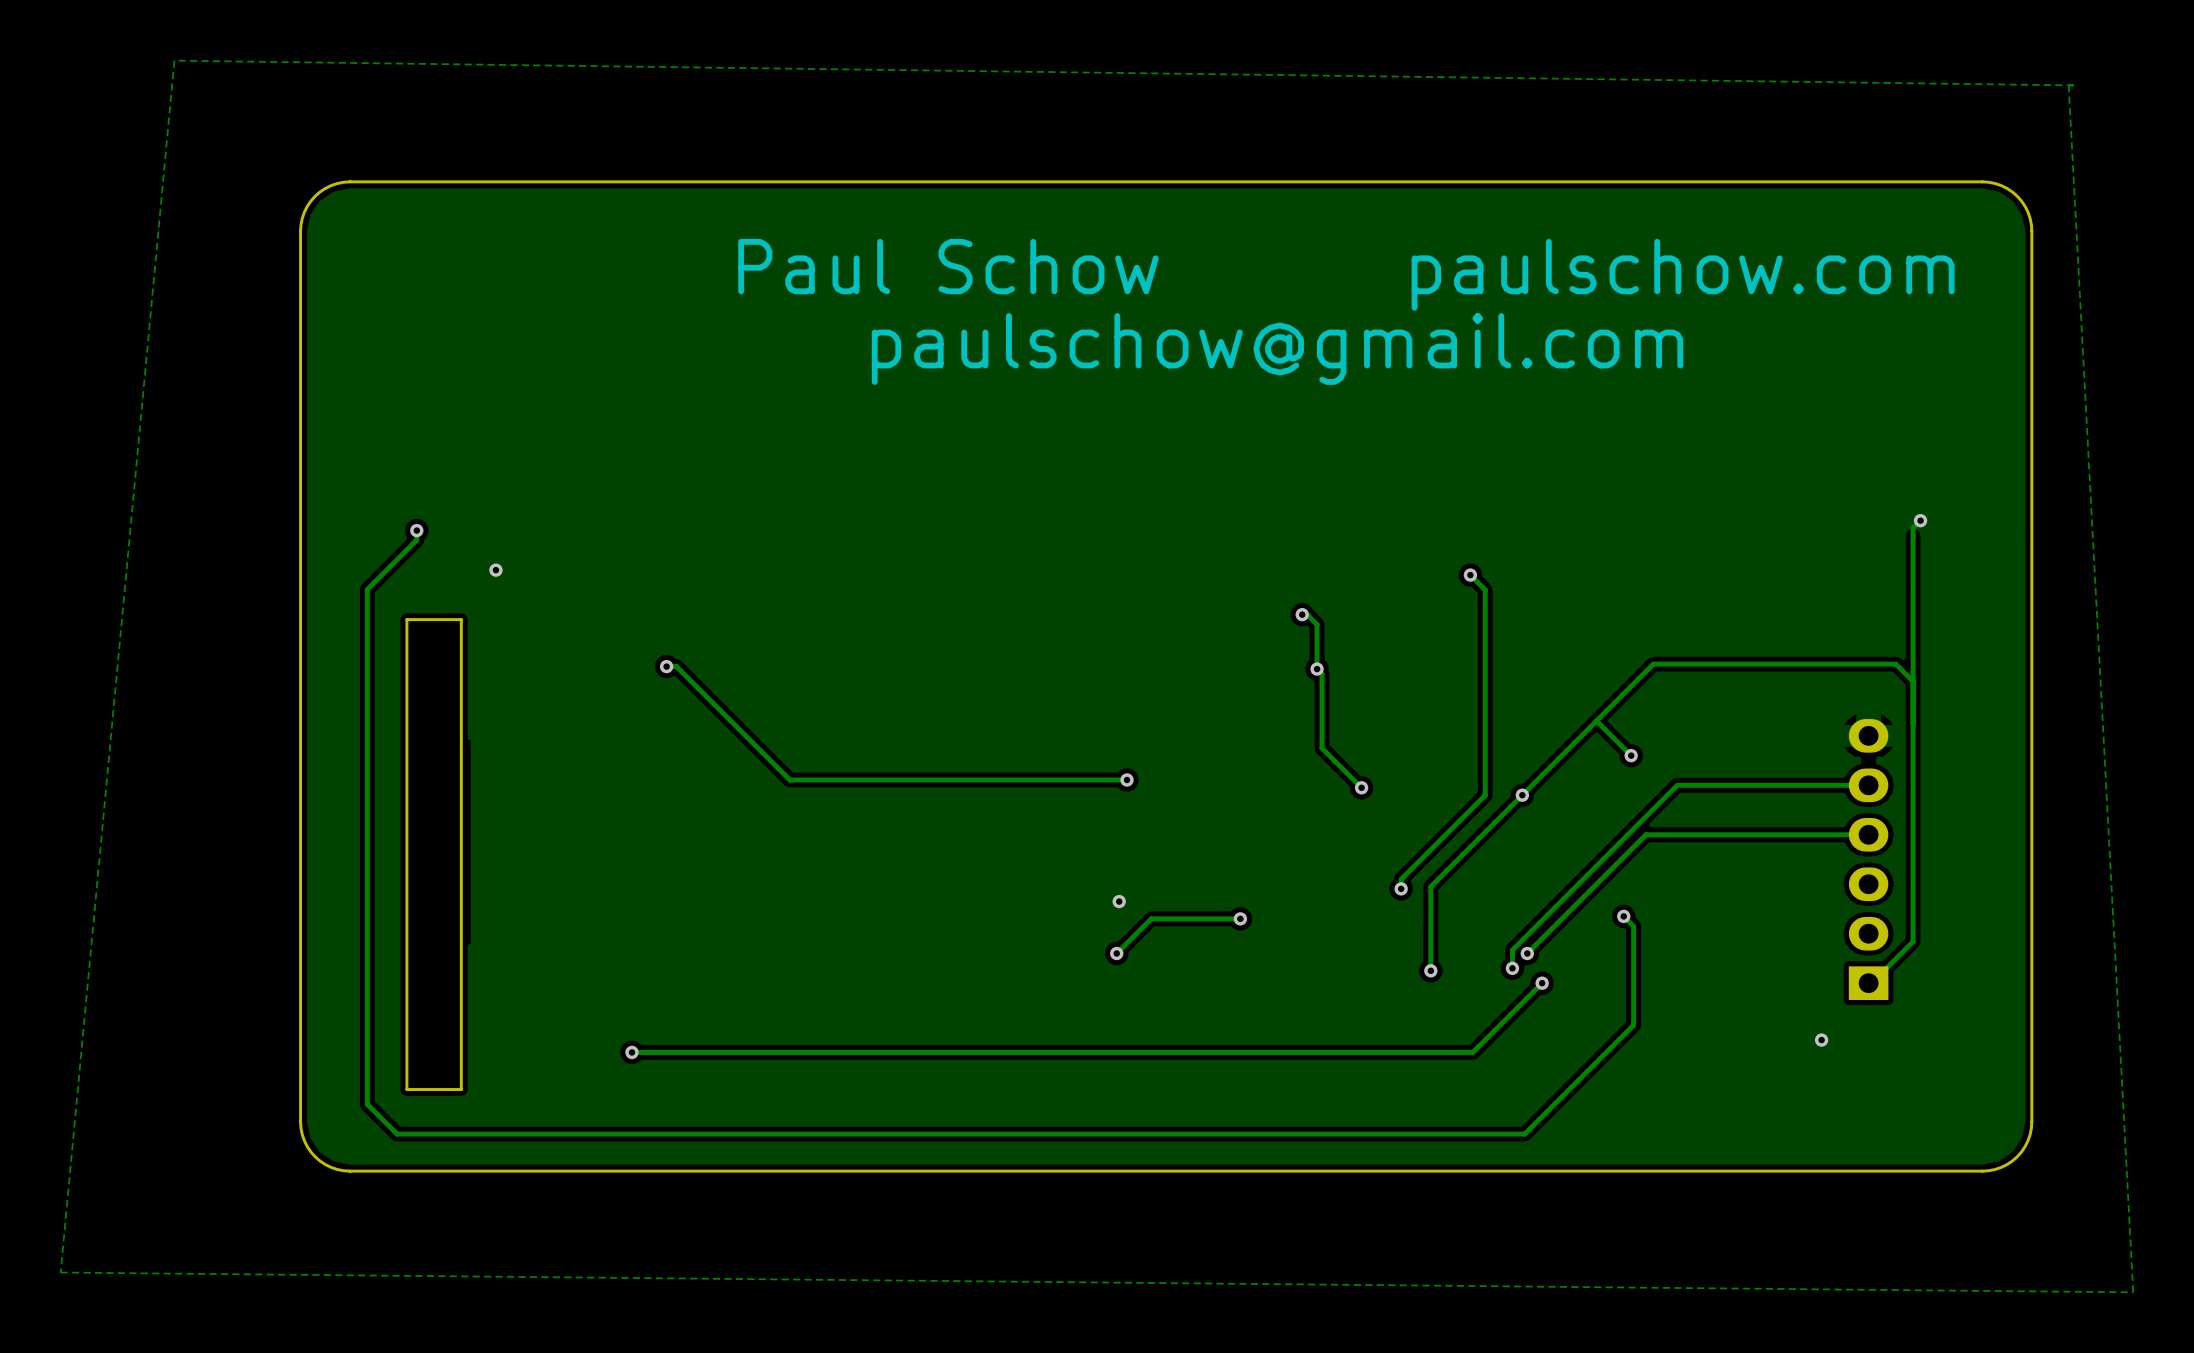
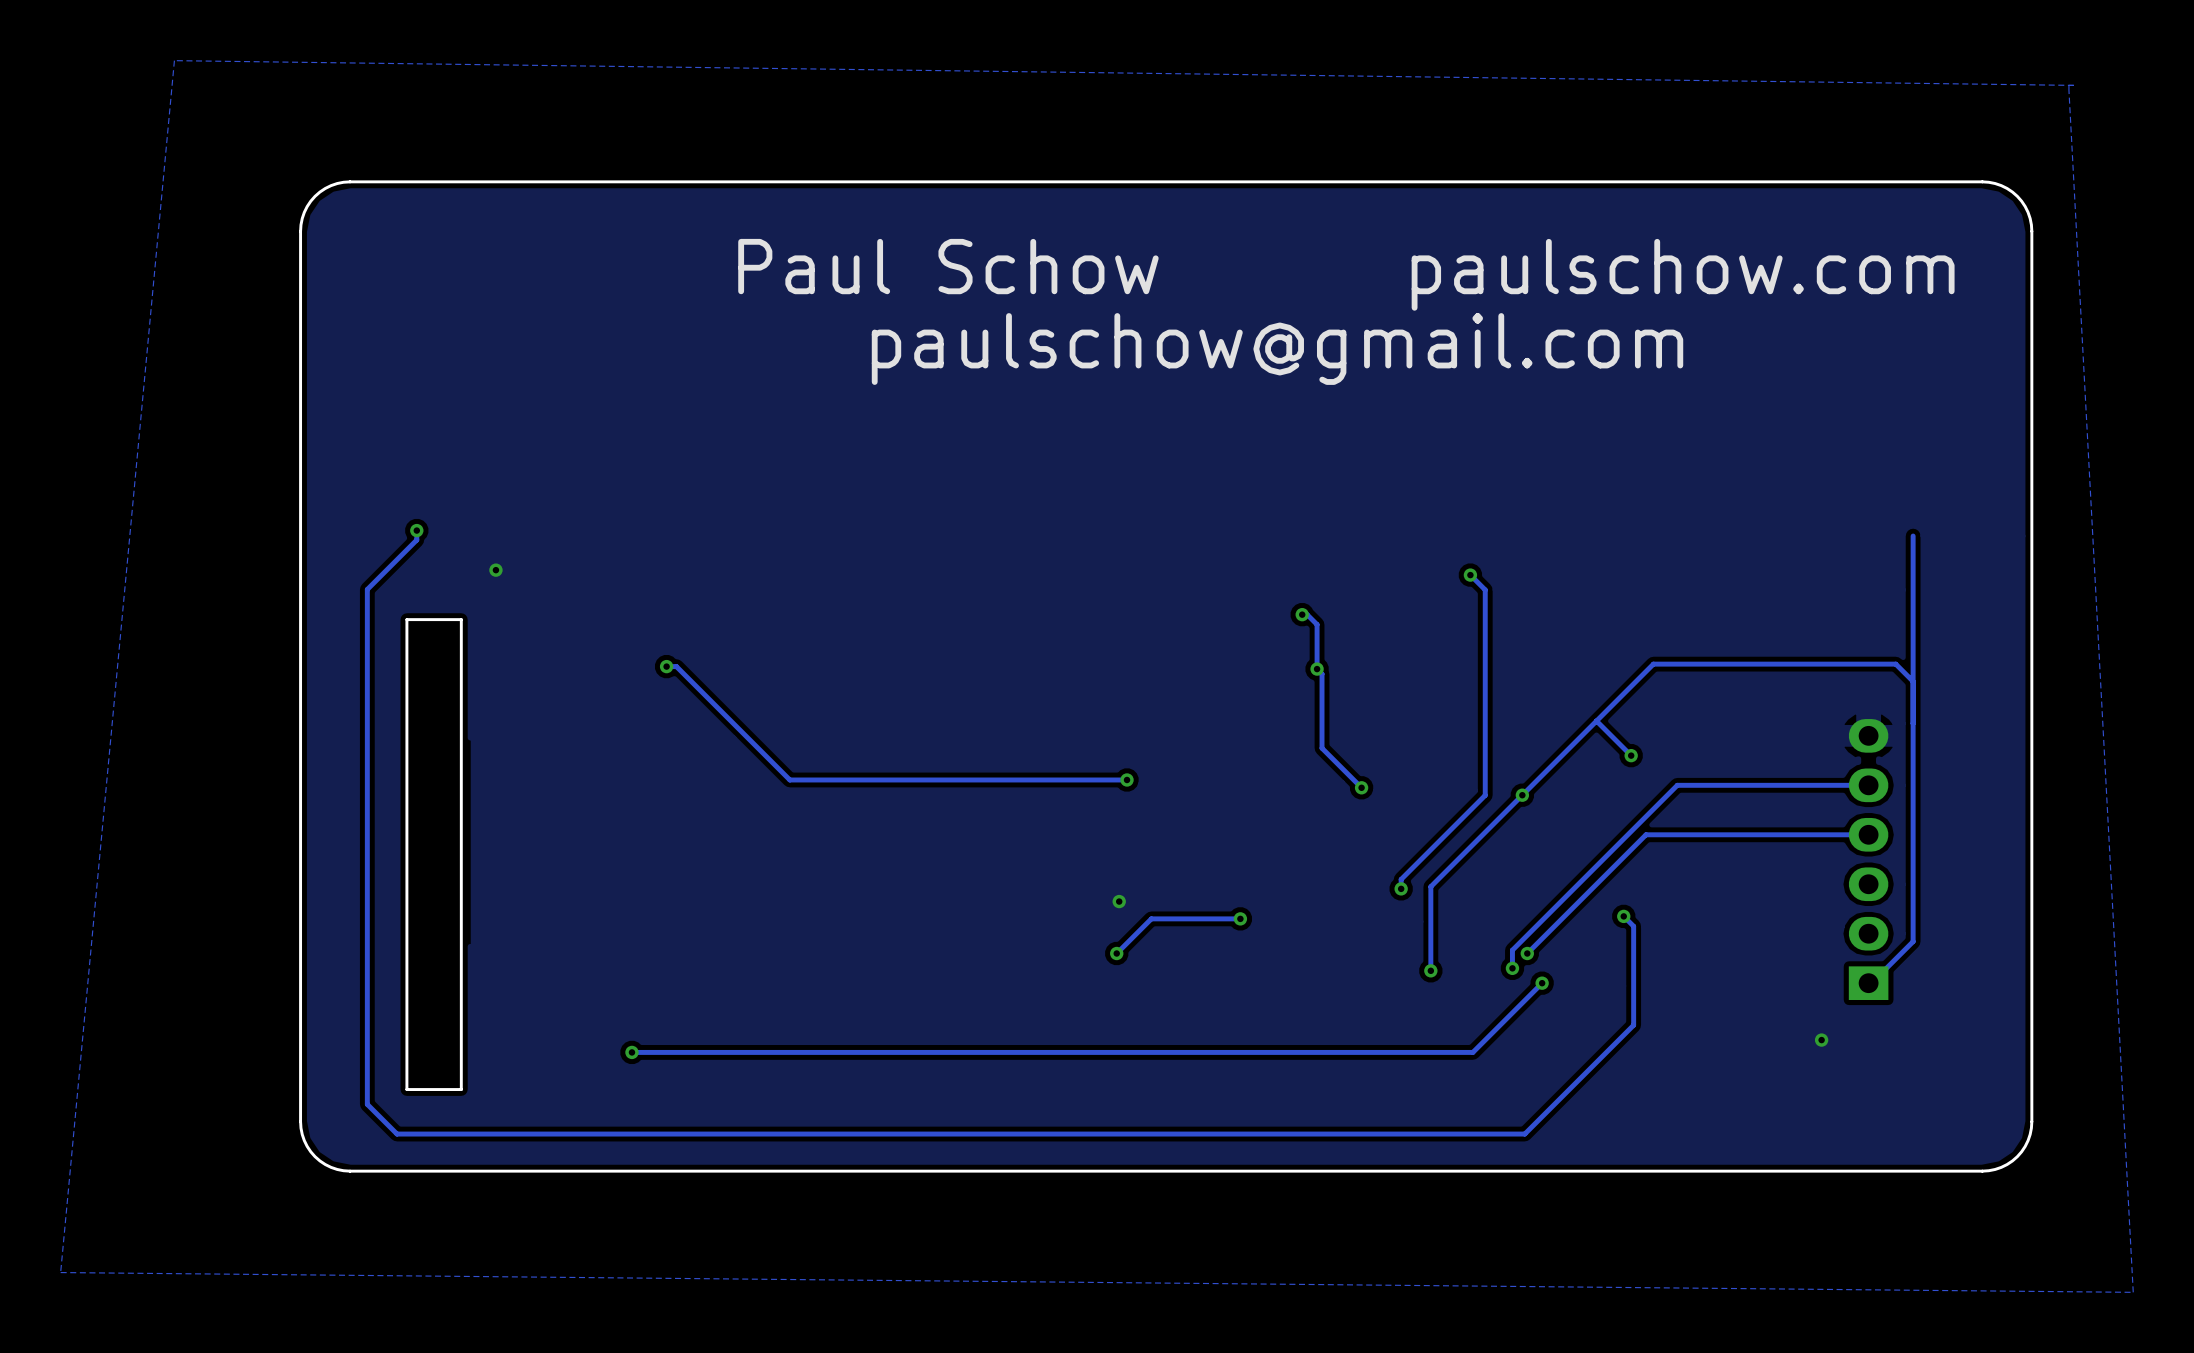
track: (1920, 520) (1913, 528) (1913, 536) -> none
via: (1920, 520) -> none

